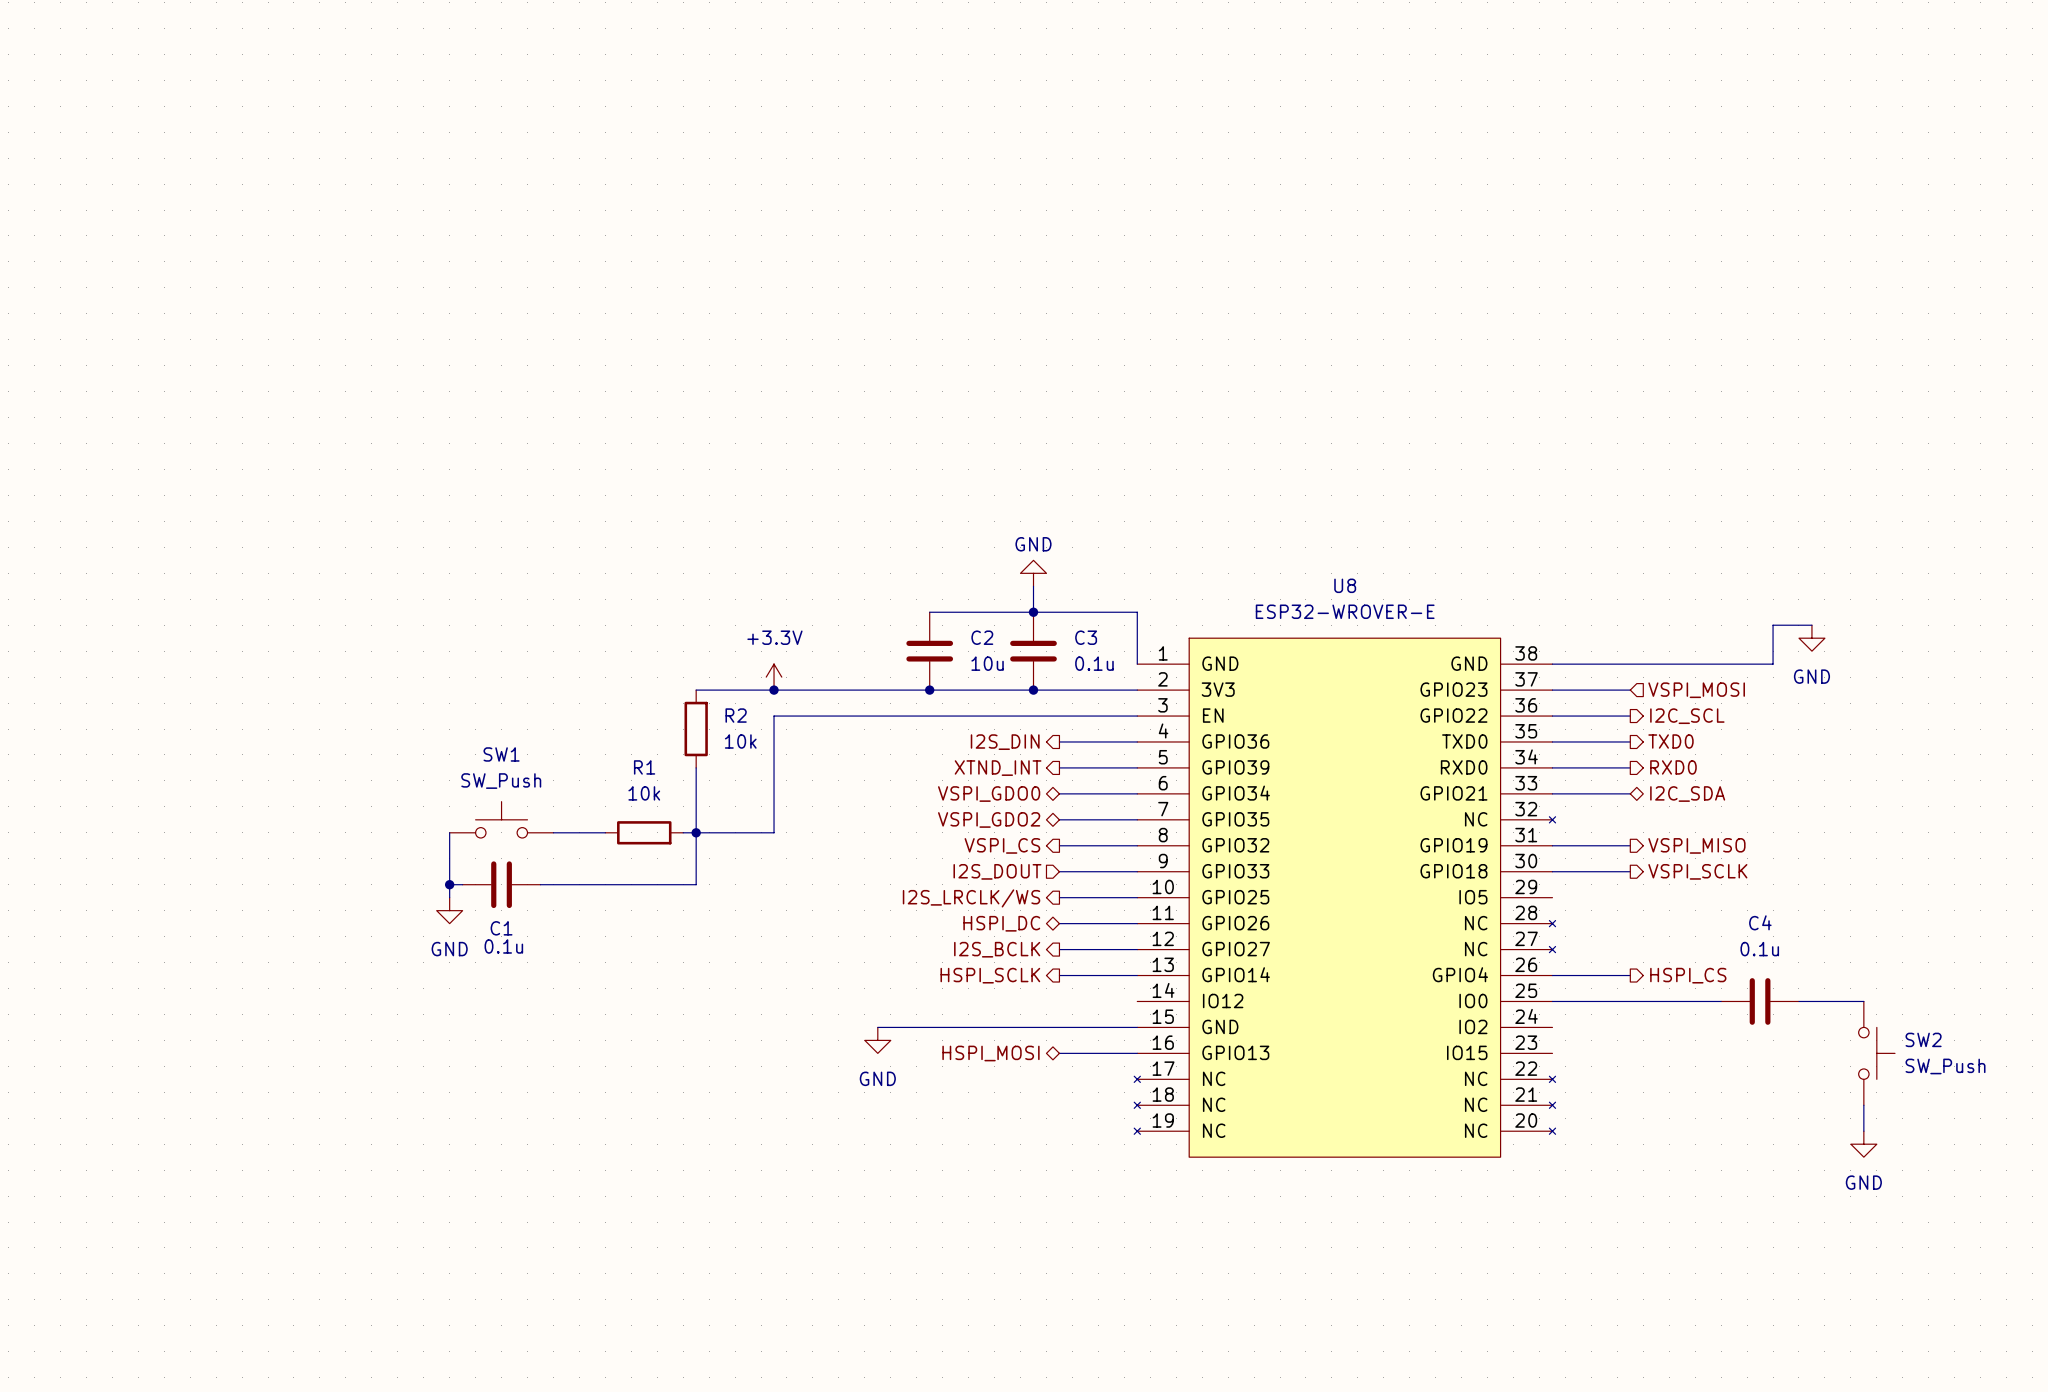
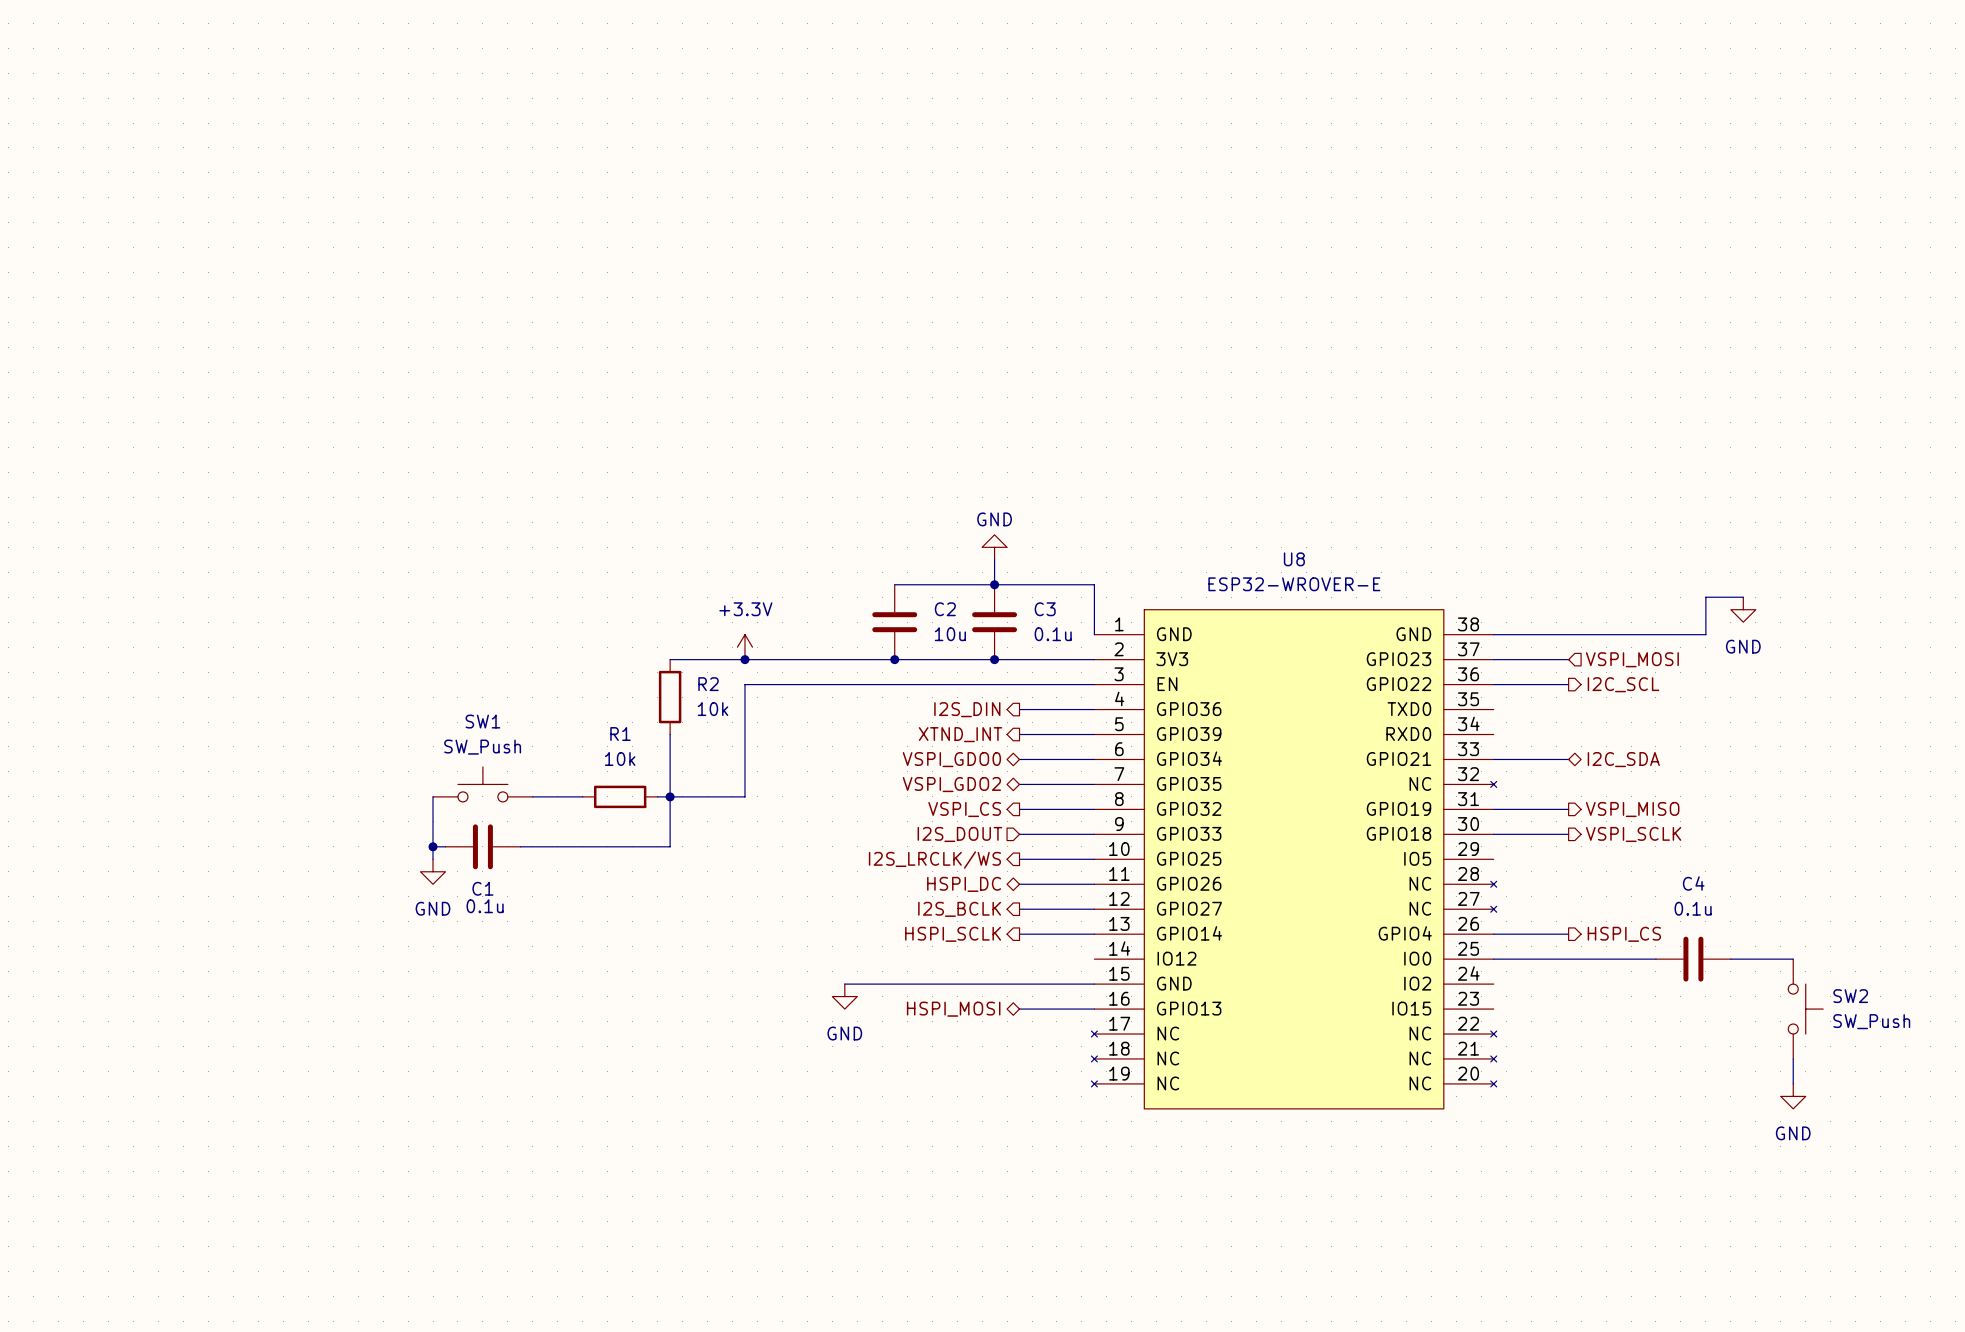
wire: (1552, 741) (1630, 741) -> none
hierarchical label: TXD0 (1670, 741) -> none
wire: (1552, 767) (1630, 767) -> none
hierarchical label: RXD0 (1673, 767) -> none

